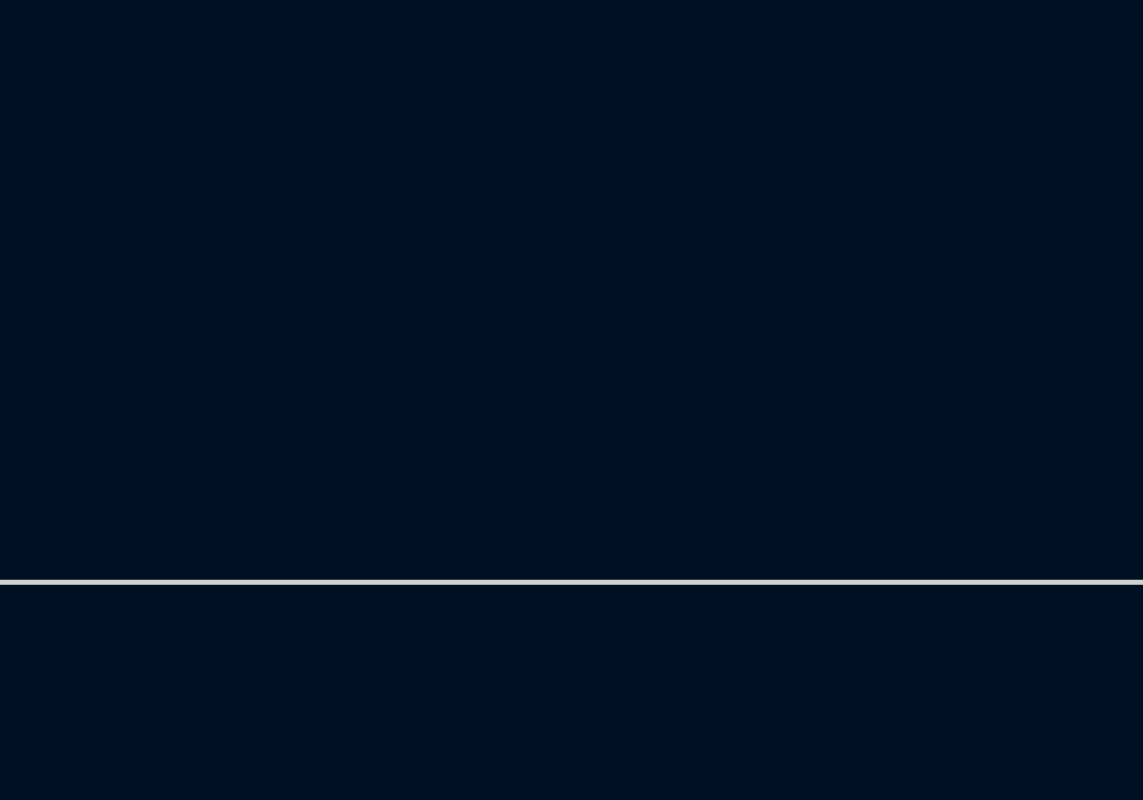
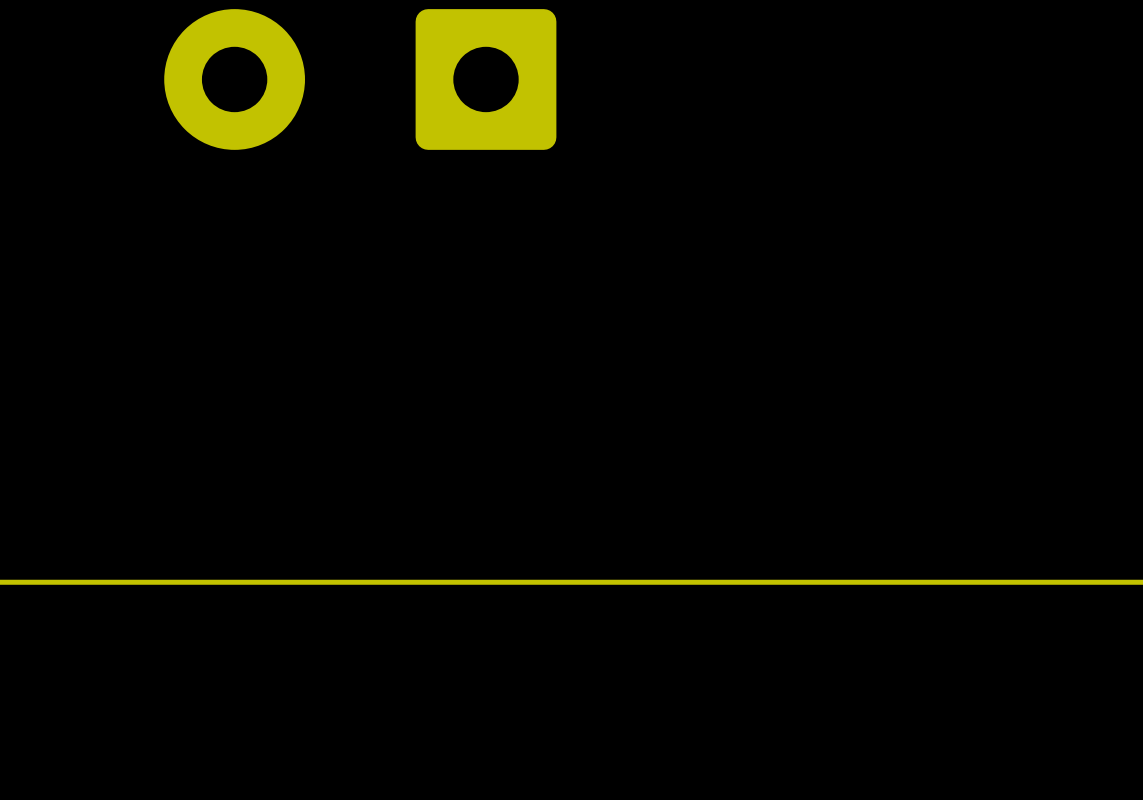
part: none -> (360, 79)

